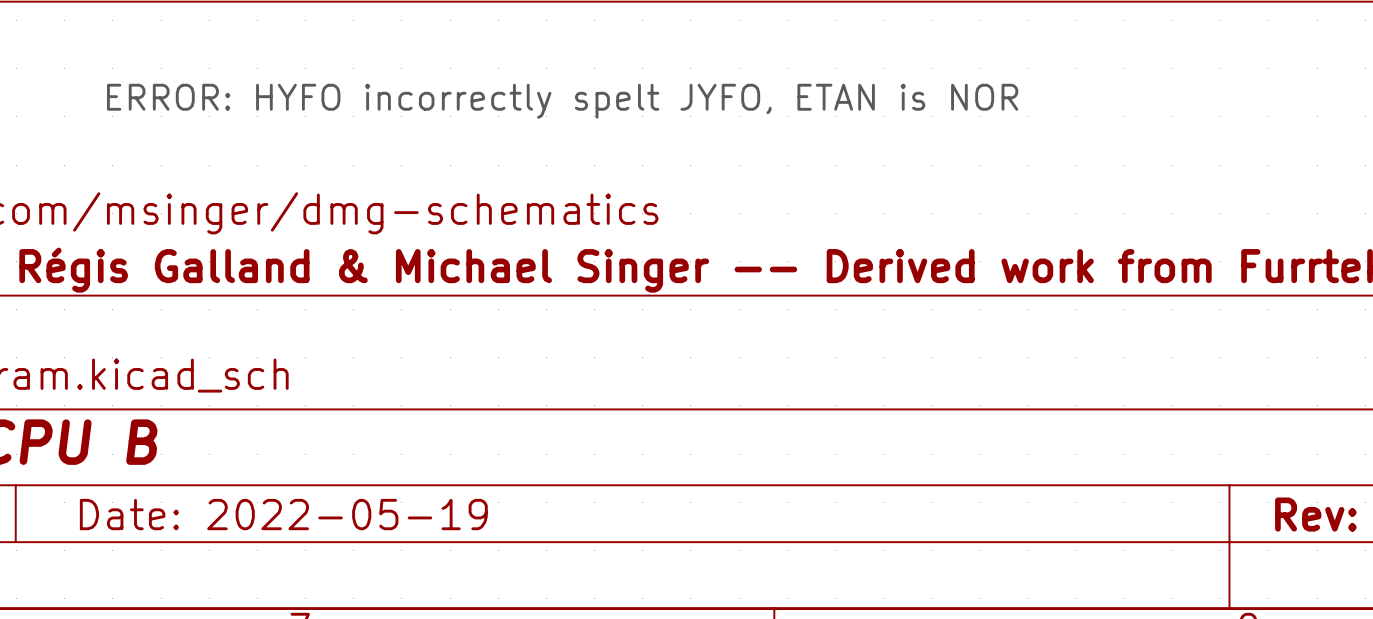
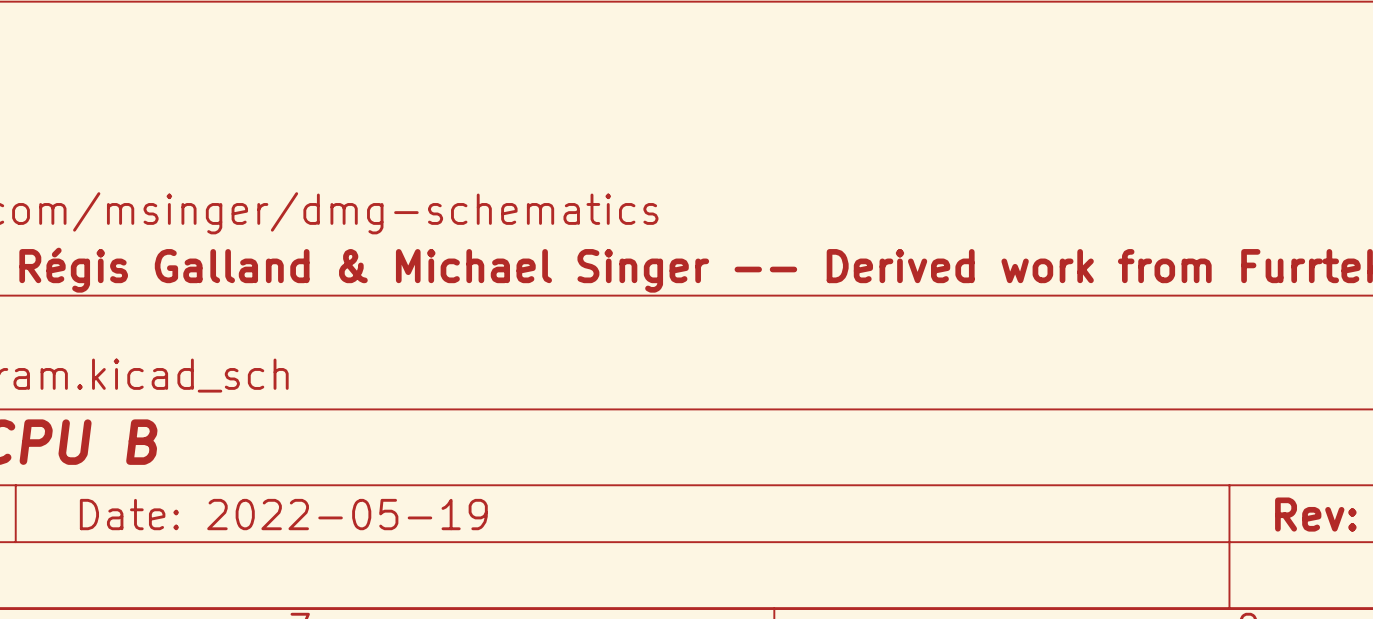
text: ERROR: HYFO incorrectly spelt JYFO, ETAN is NOR (562, 101) -> none

